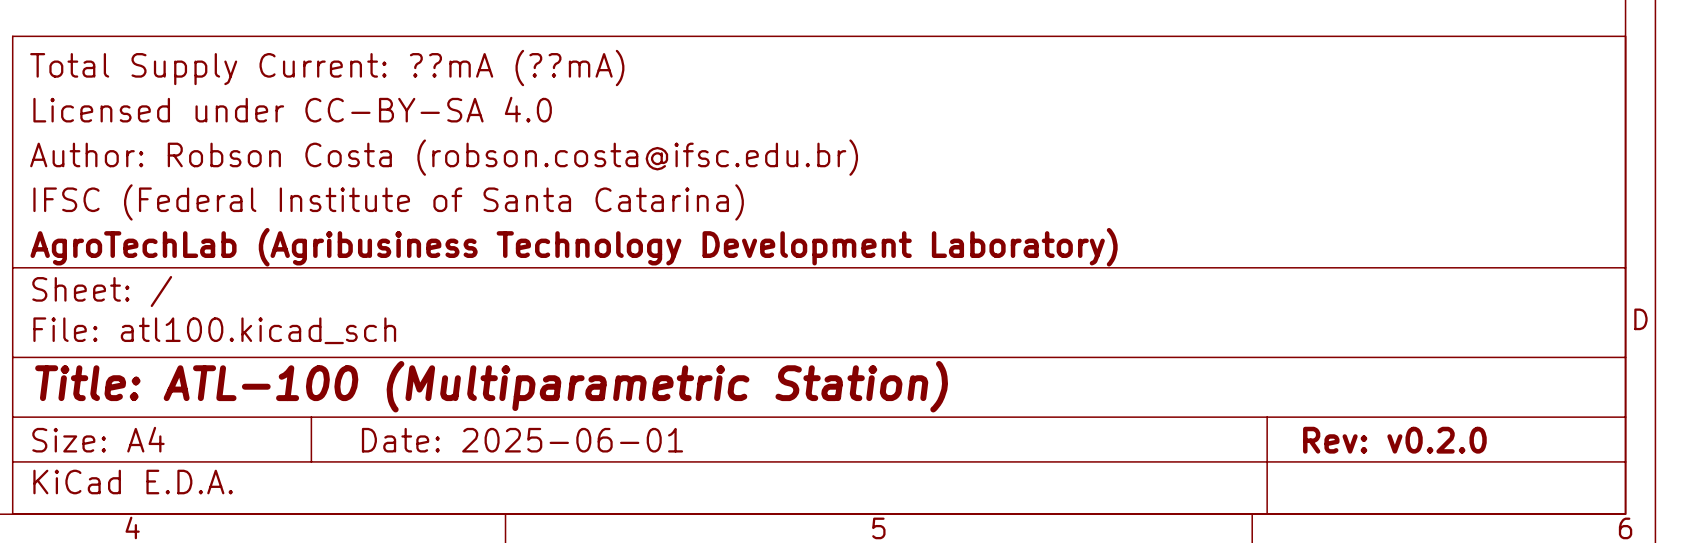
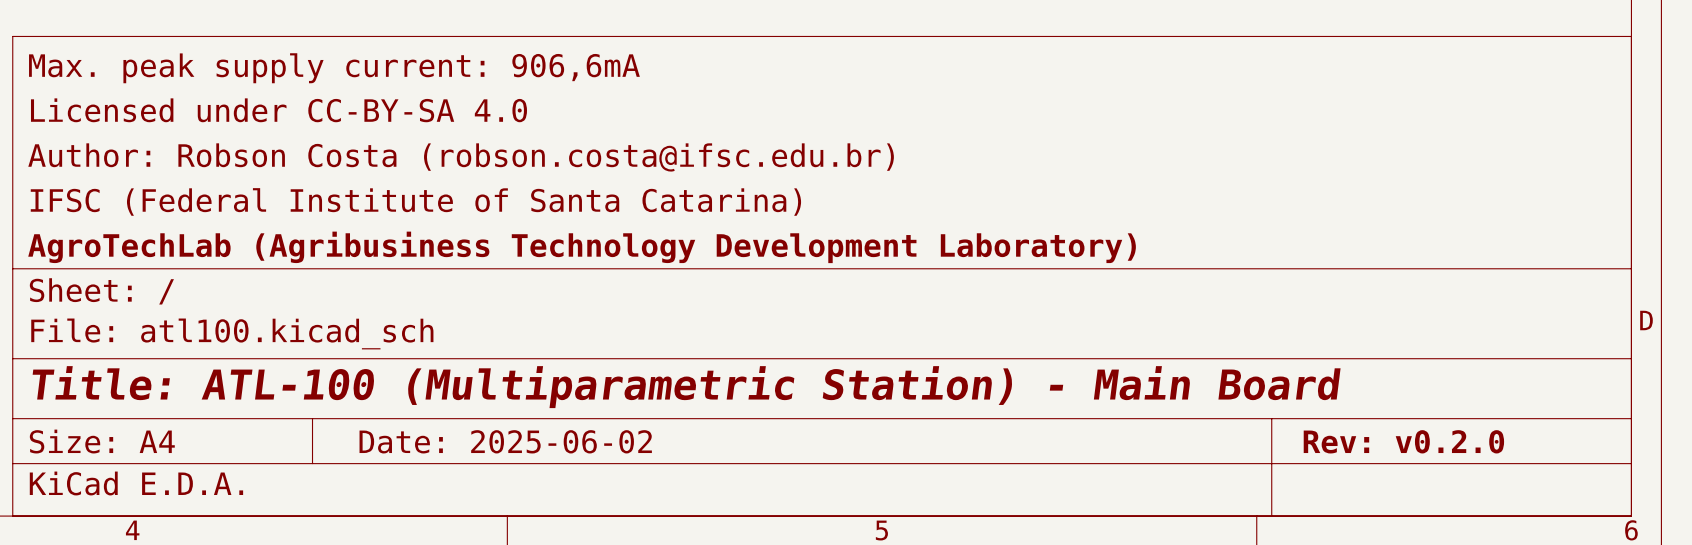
title block: Total Supply Current: ??mA (??mA) (327, 68) -> Max. peak supply current: 906,6mA (334, 68)
title block: Title: ATL-100 (Multiparametric Station) (491, 386) -> Title: ATL-100 (Multiparametric Station) - Main Board (686, 387)
title block: Date: 2025-06-01 (522, 440) -> Date: 2025-06-02 (505, 441)

